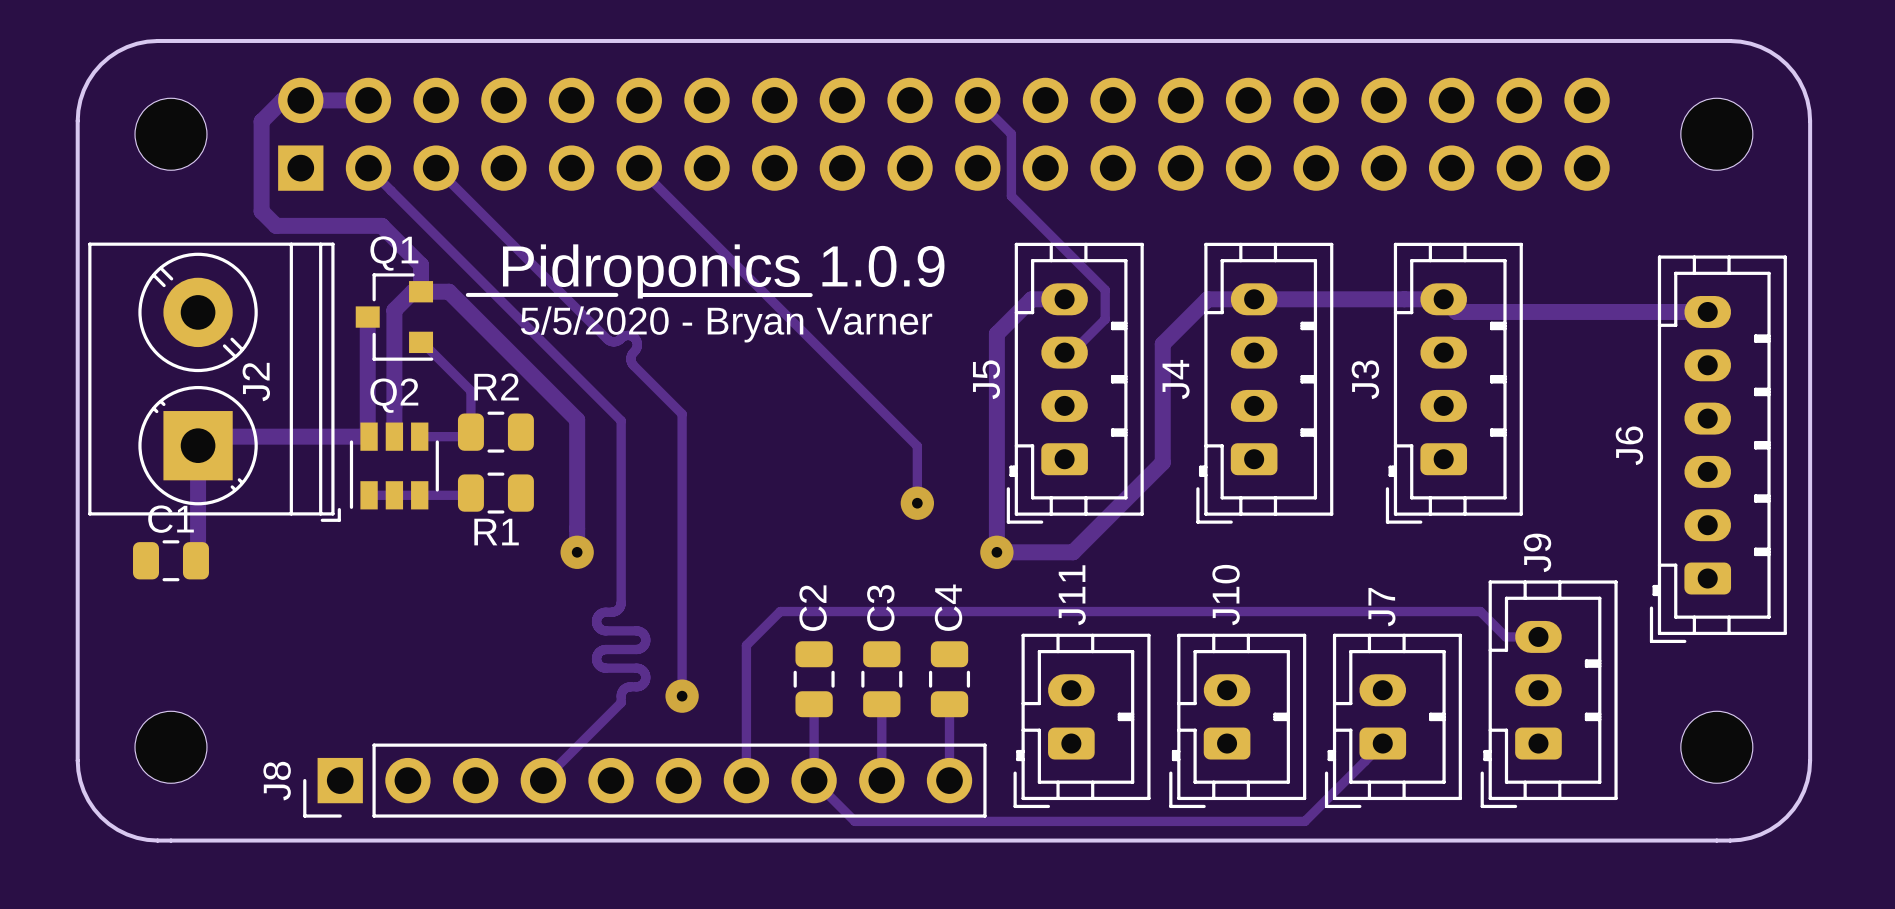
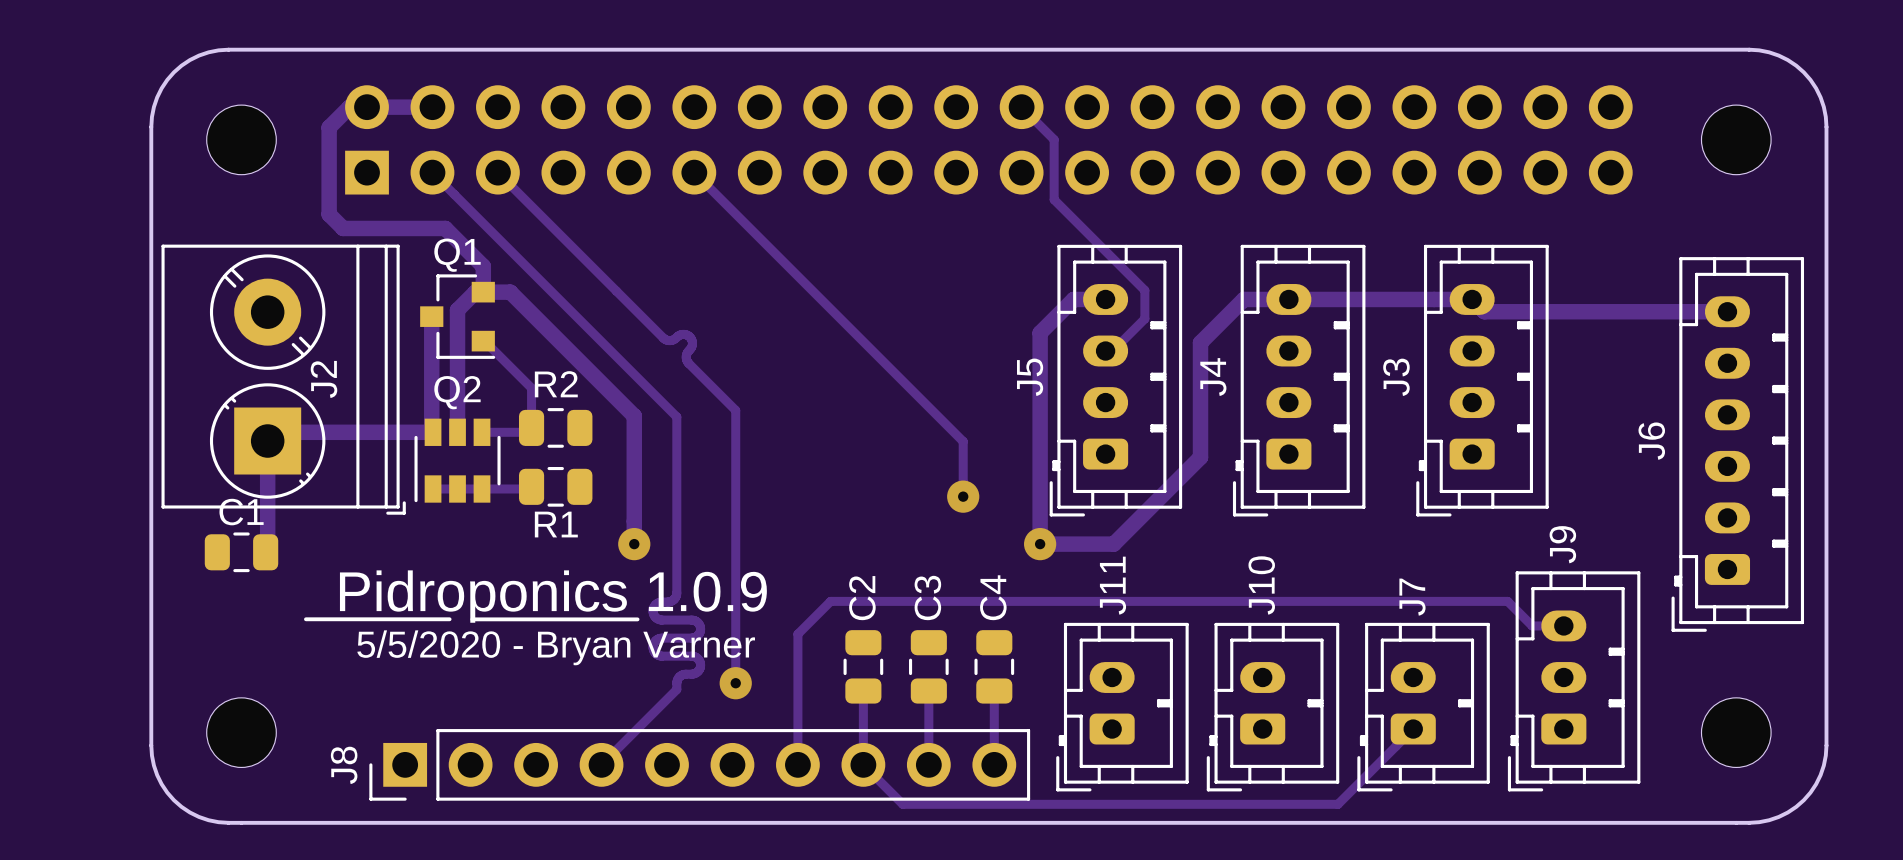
text position: Pidroponics 1.0.9 (723, 271) -> Pidroponics 1.0.9 (553, 596)
line: (467, 294) (616, 294) -> (305, 619) (449, 619)
line: (639, 295) (810, 295) -> (472, 619) (637, 619)
text position: 5/5/2020 - Bryan Varner (726, 324) -> 5/5/2020 - Bryan Varner (556, 647)

